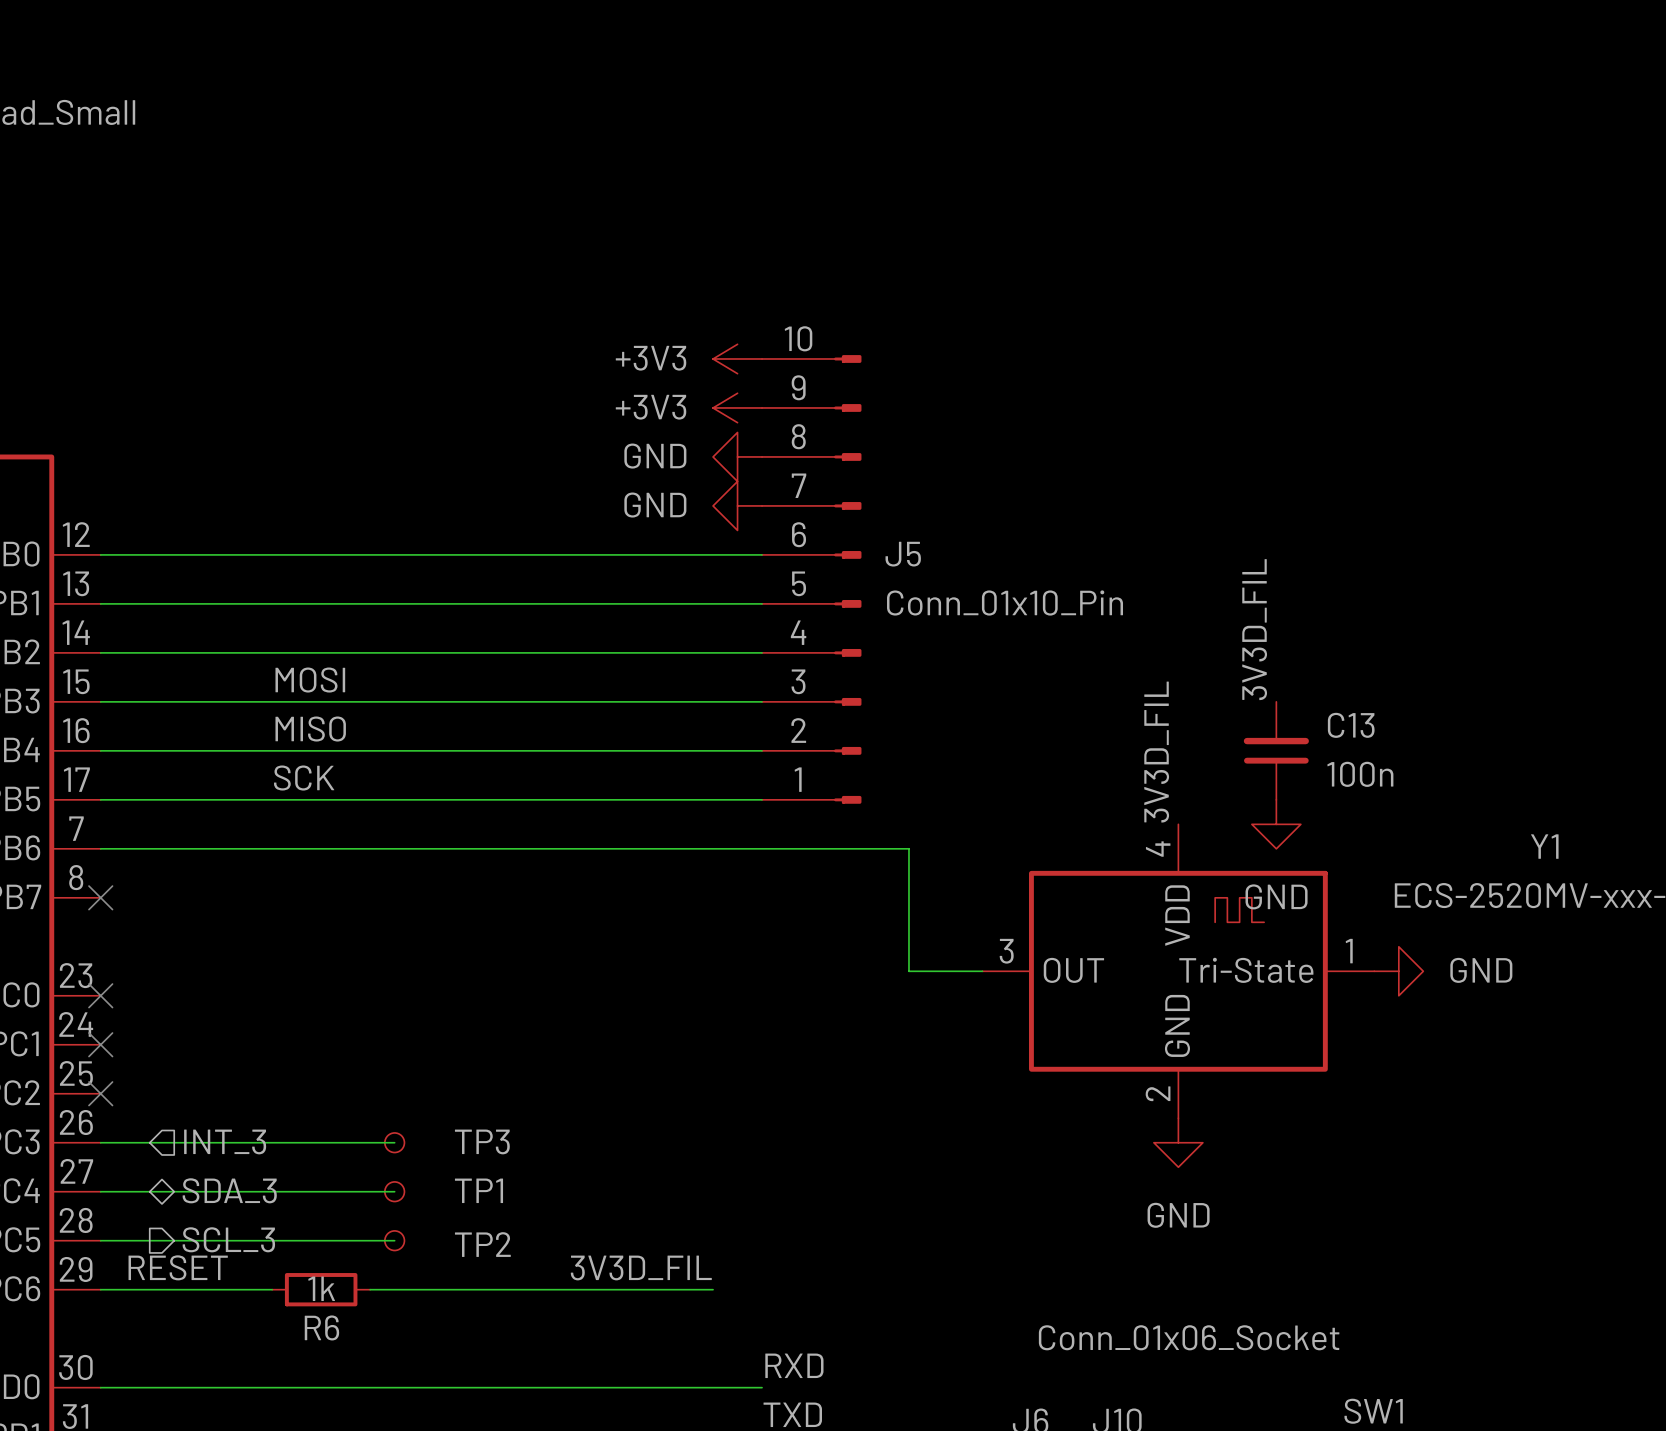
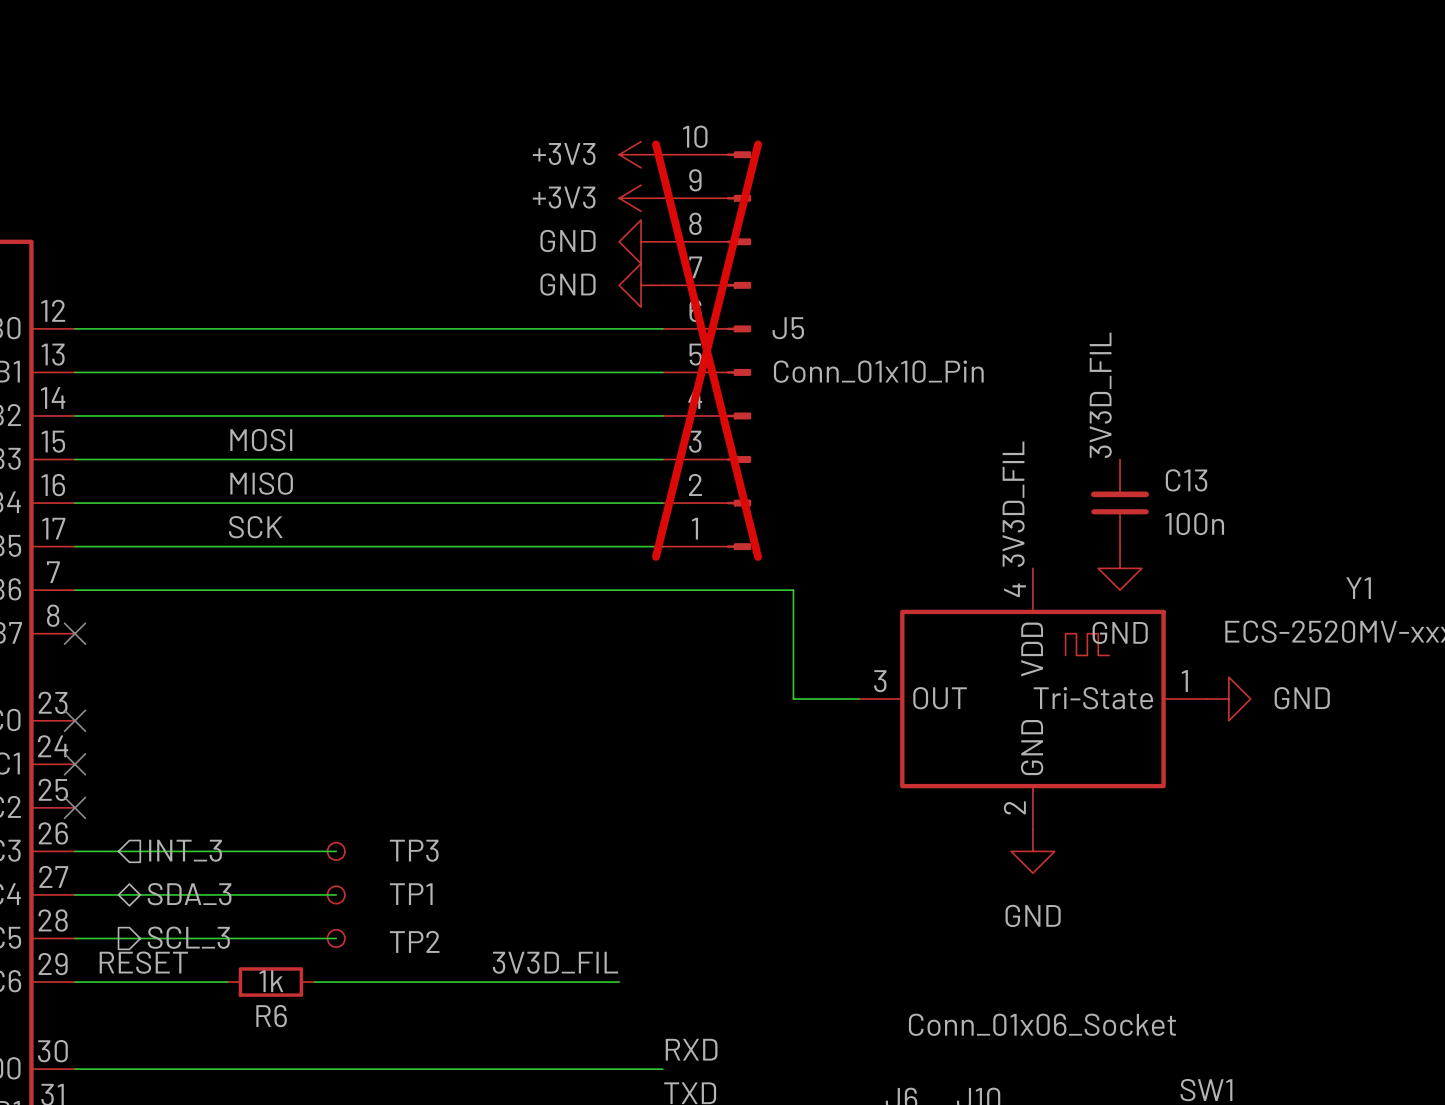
J5 do-not-place cross: none -> (707, 350)

